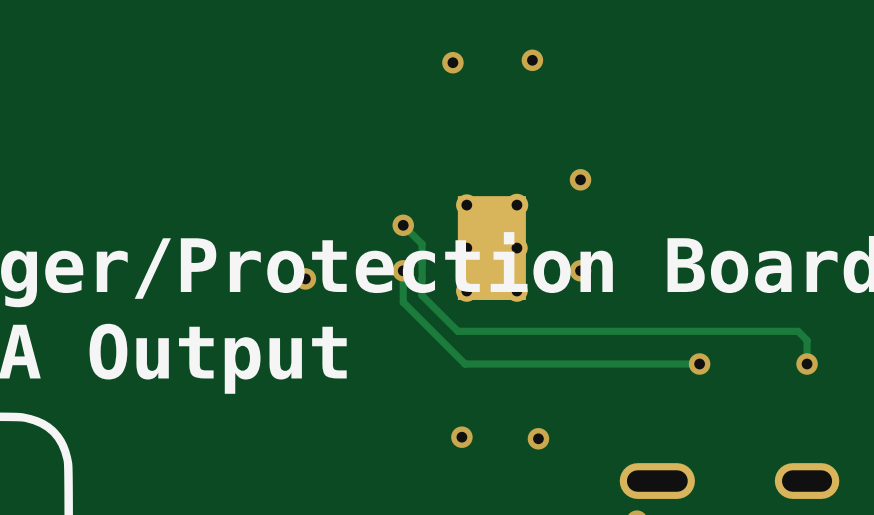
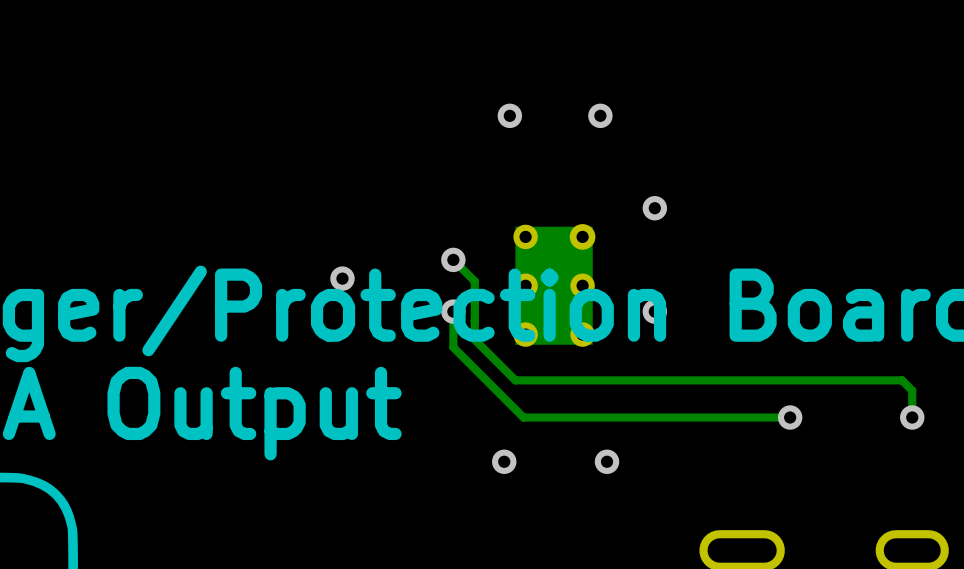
via position: (532, 60) -> (600, 115)
via position: (452, 62) -> (509, 115)
via position: (305, 278) -> (342, 278)
via position: (461, 437) -> (504, 461)
via position: (538, 438) -> (607, 461)

